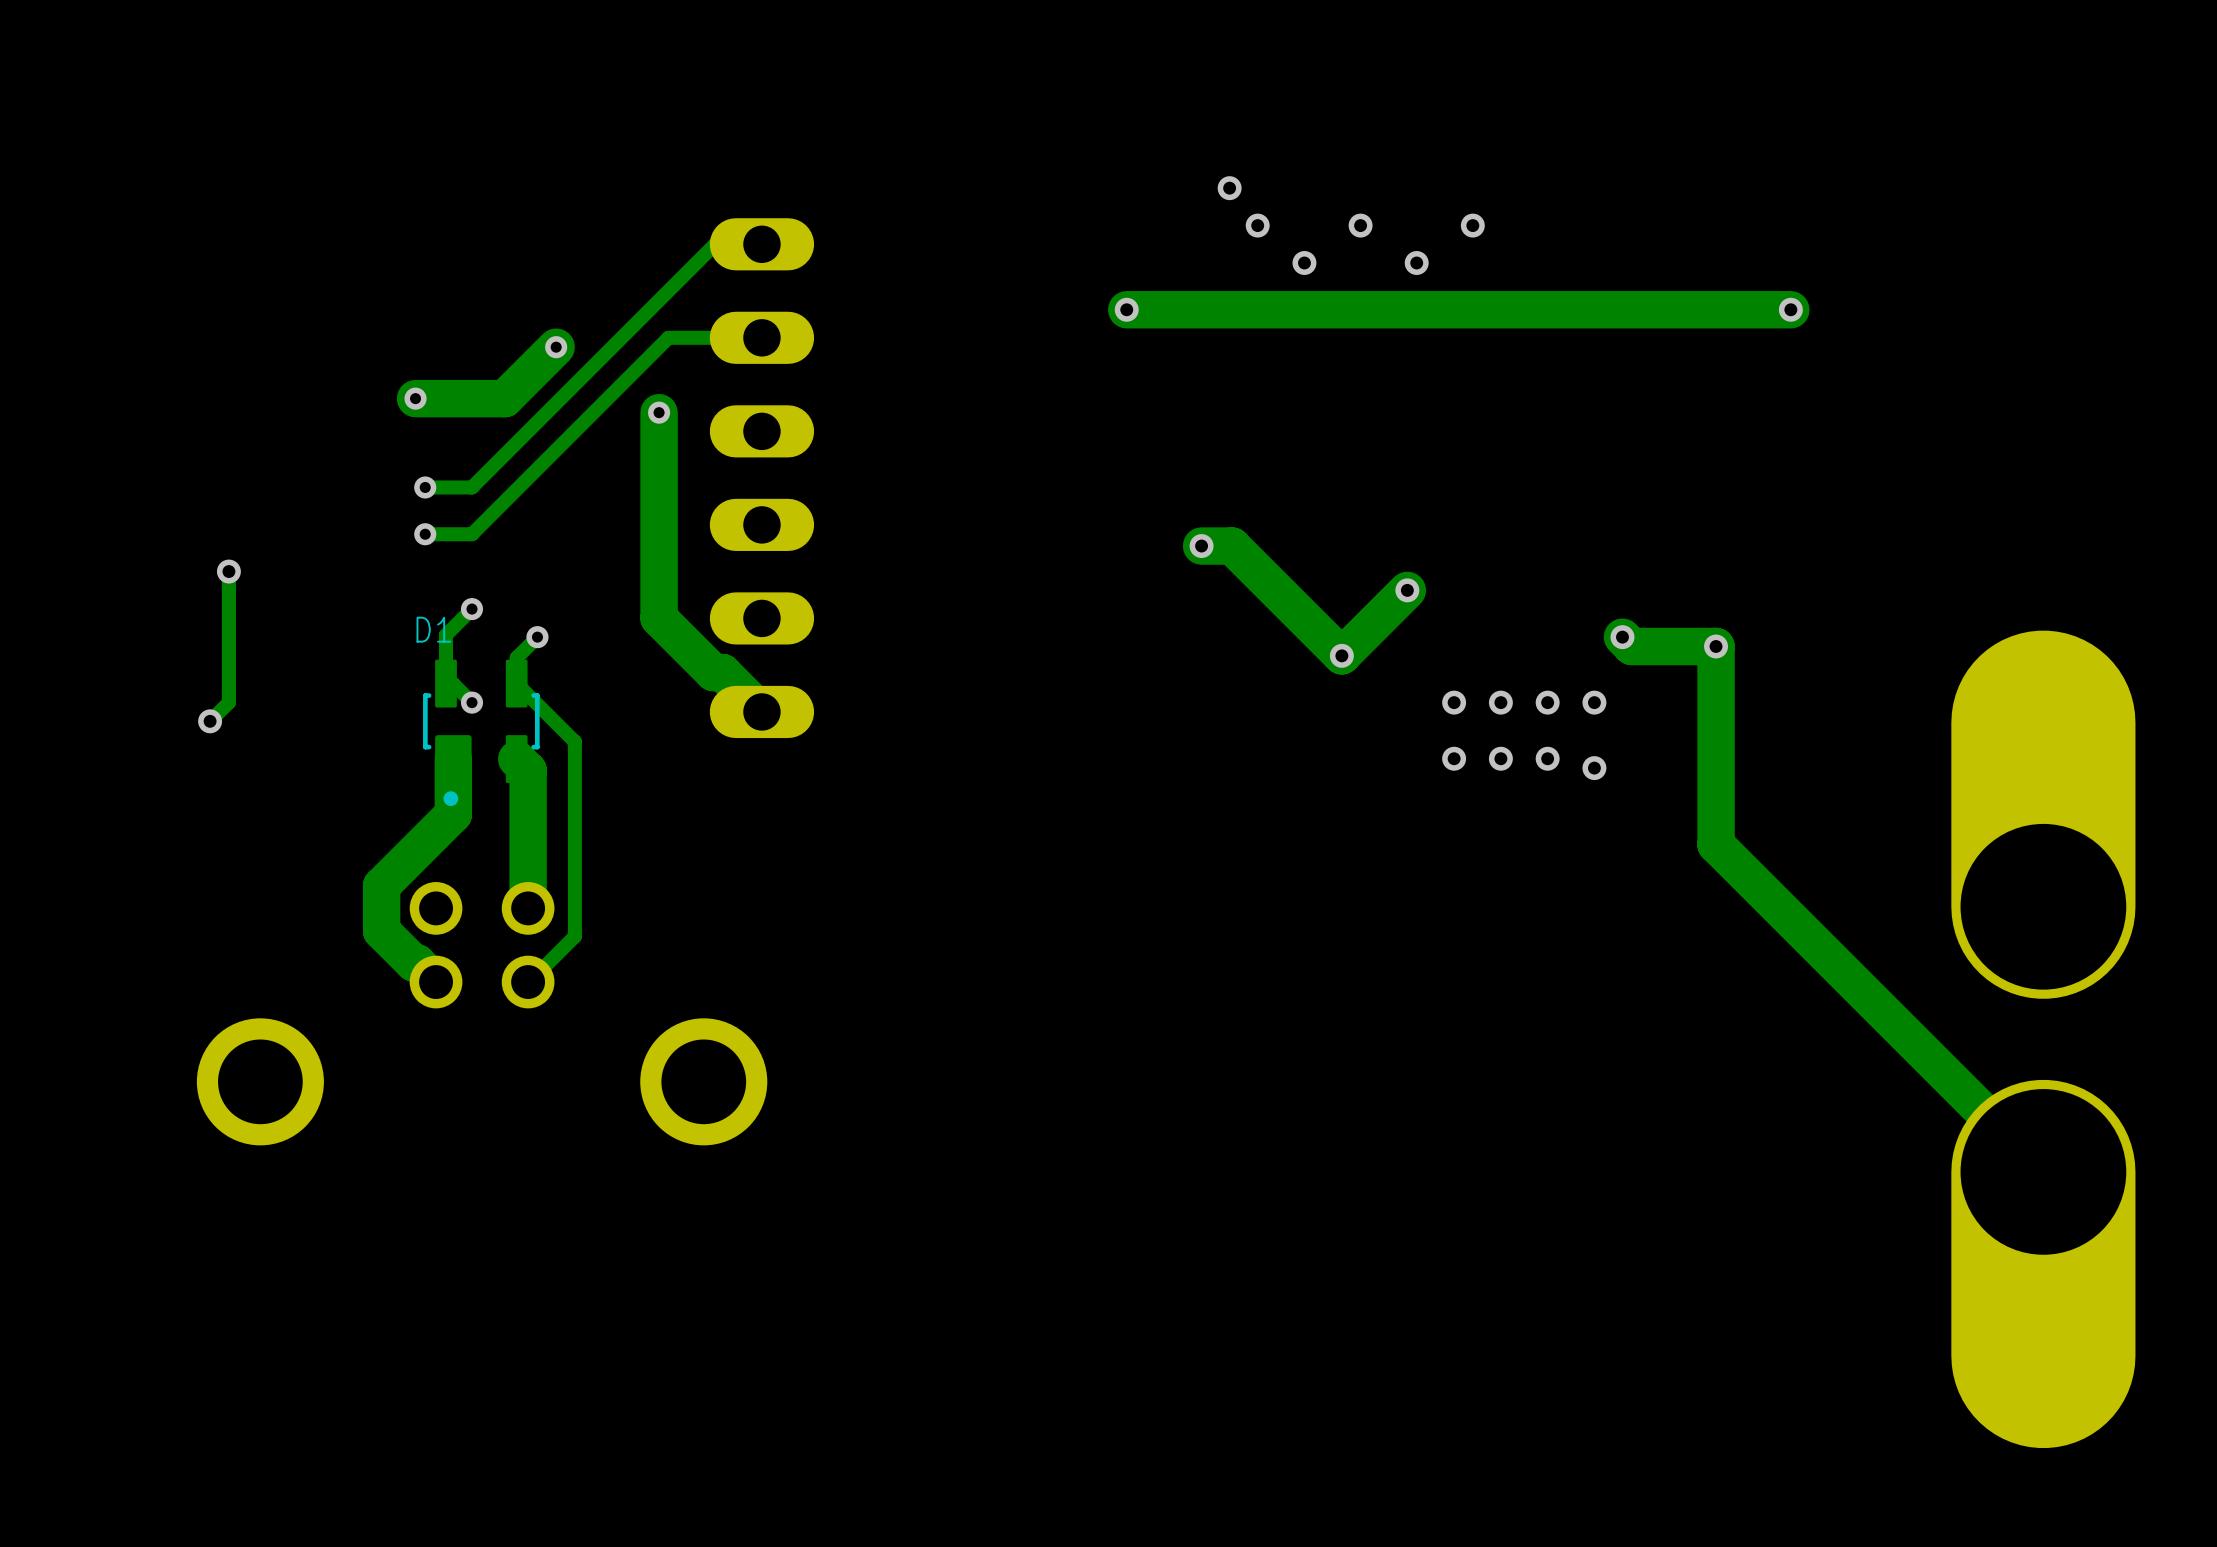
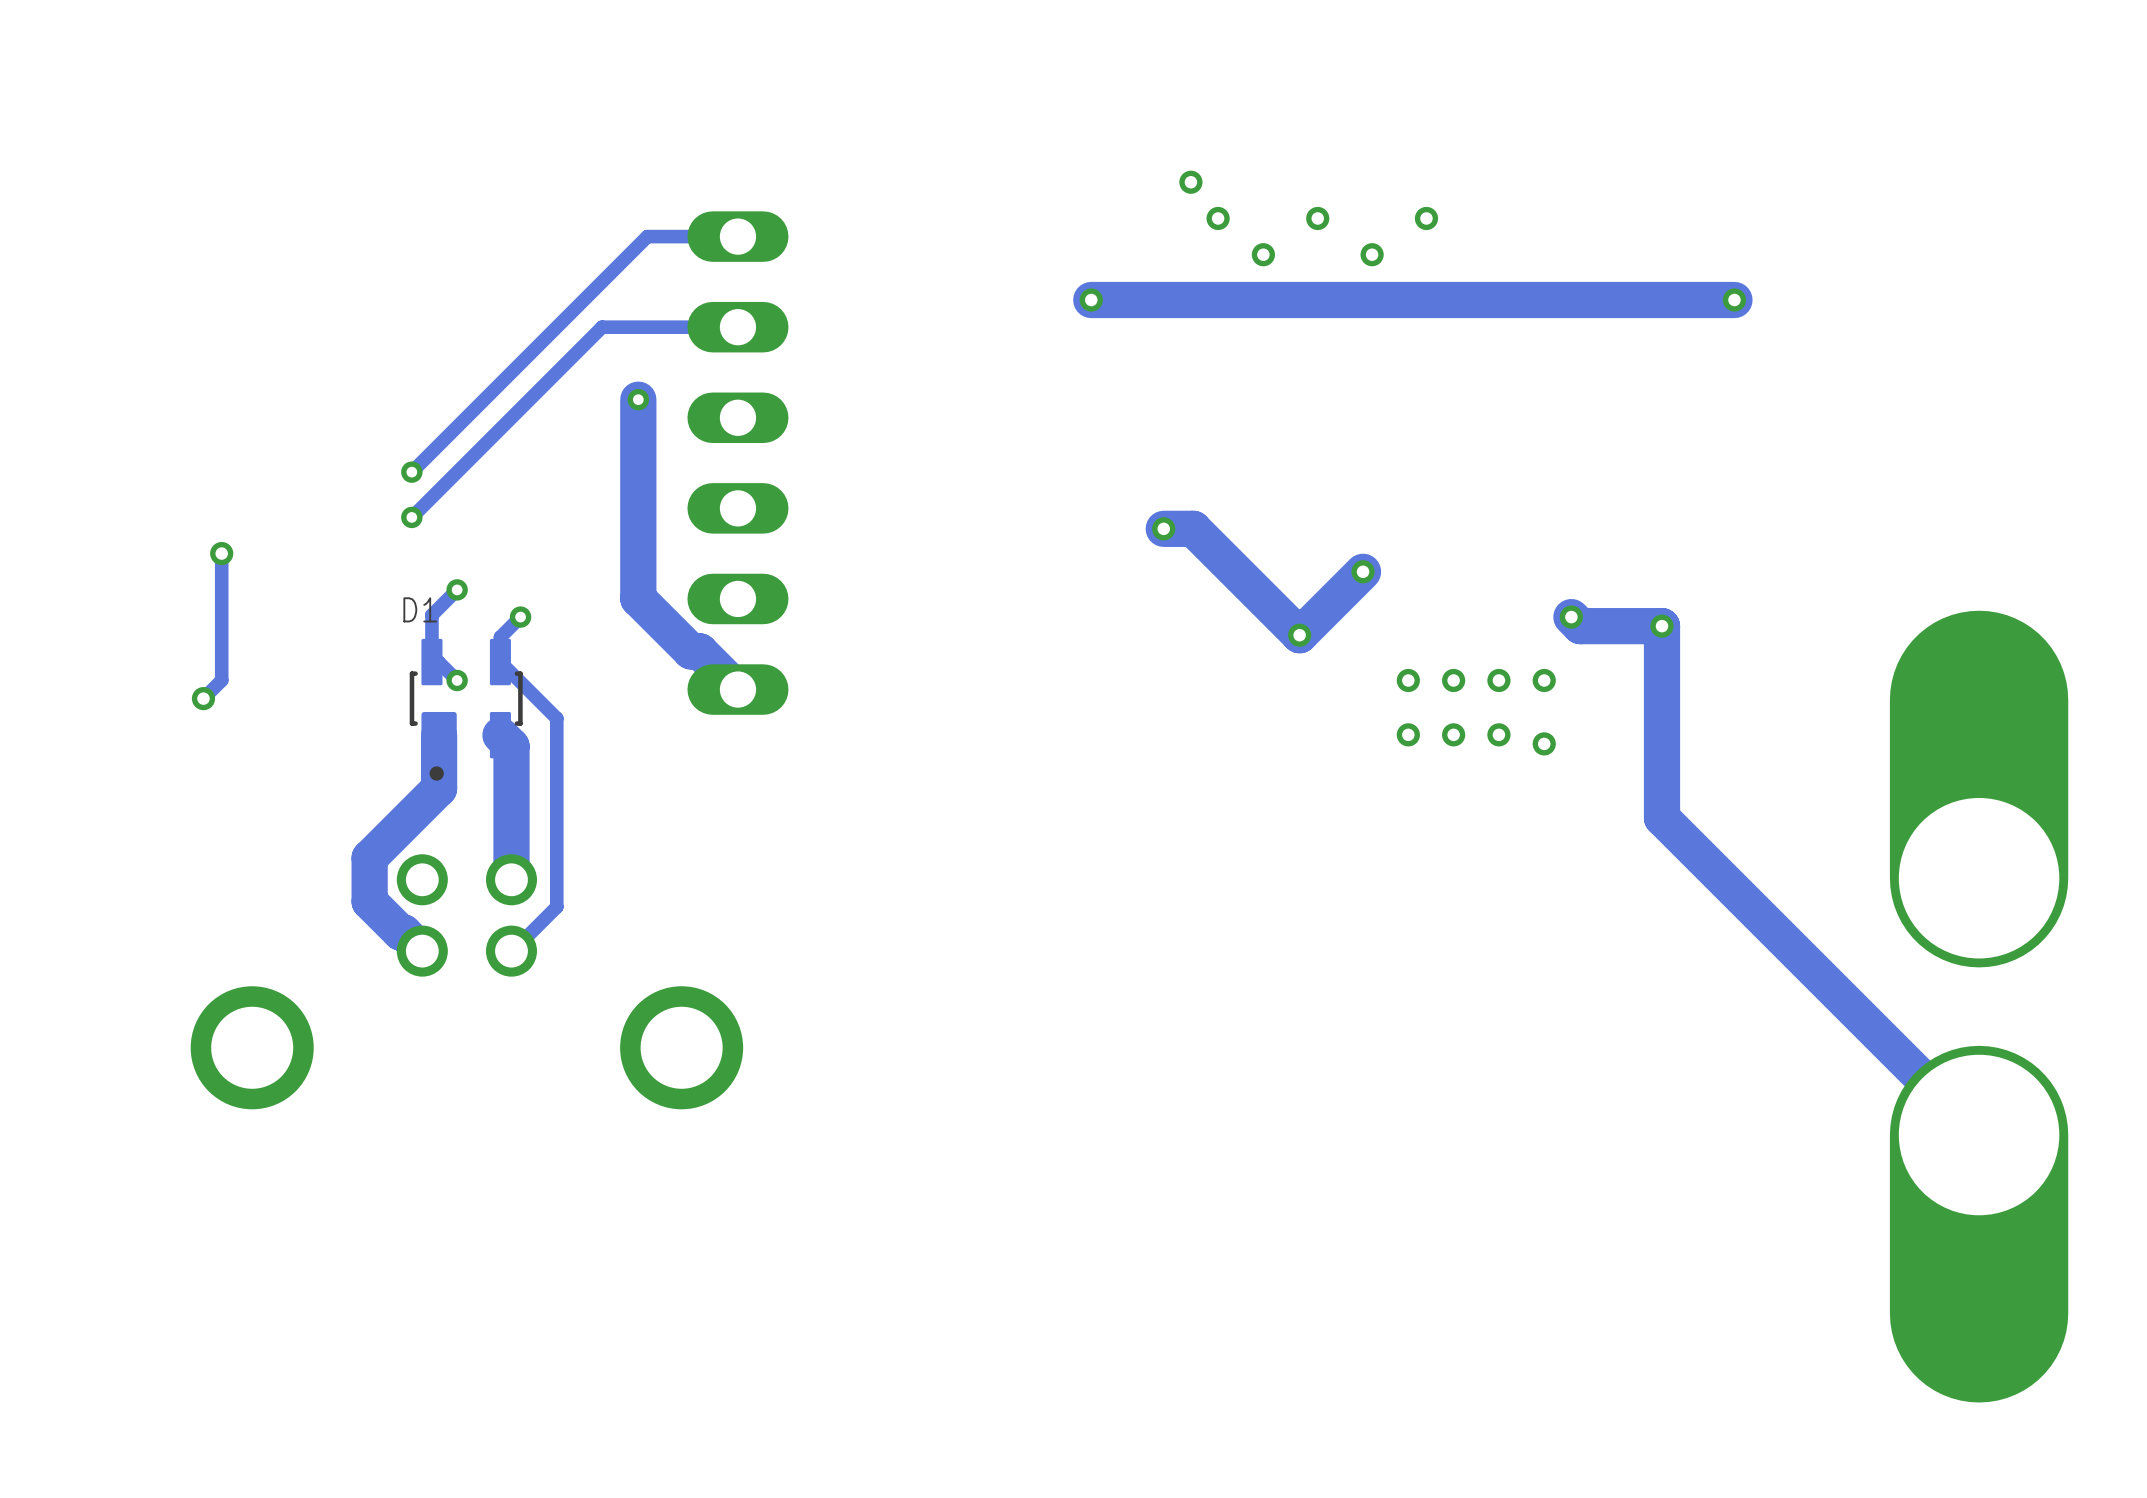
track: (715, 244) (621, 337) -> (647, 327) (602, 327)
track: none -> (692, 236) (647, 236) (411, 472)
track: (668, 337) (471, 534) (425, 534) -> none
track: (556, 347) (504, 398) (415, 398) -> none
via: (556, 347) -> none
via: (415, 398) -> none
track: (471, 487) (425, 487) -> (457, 472) (411, 517)

